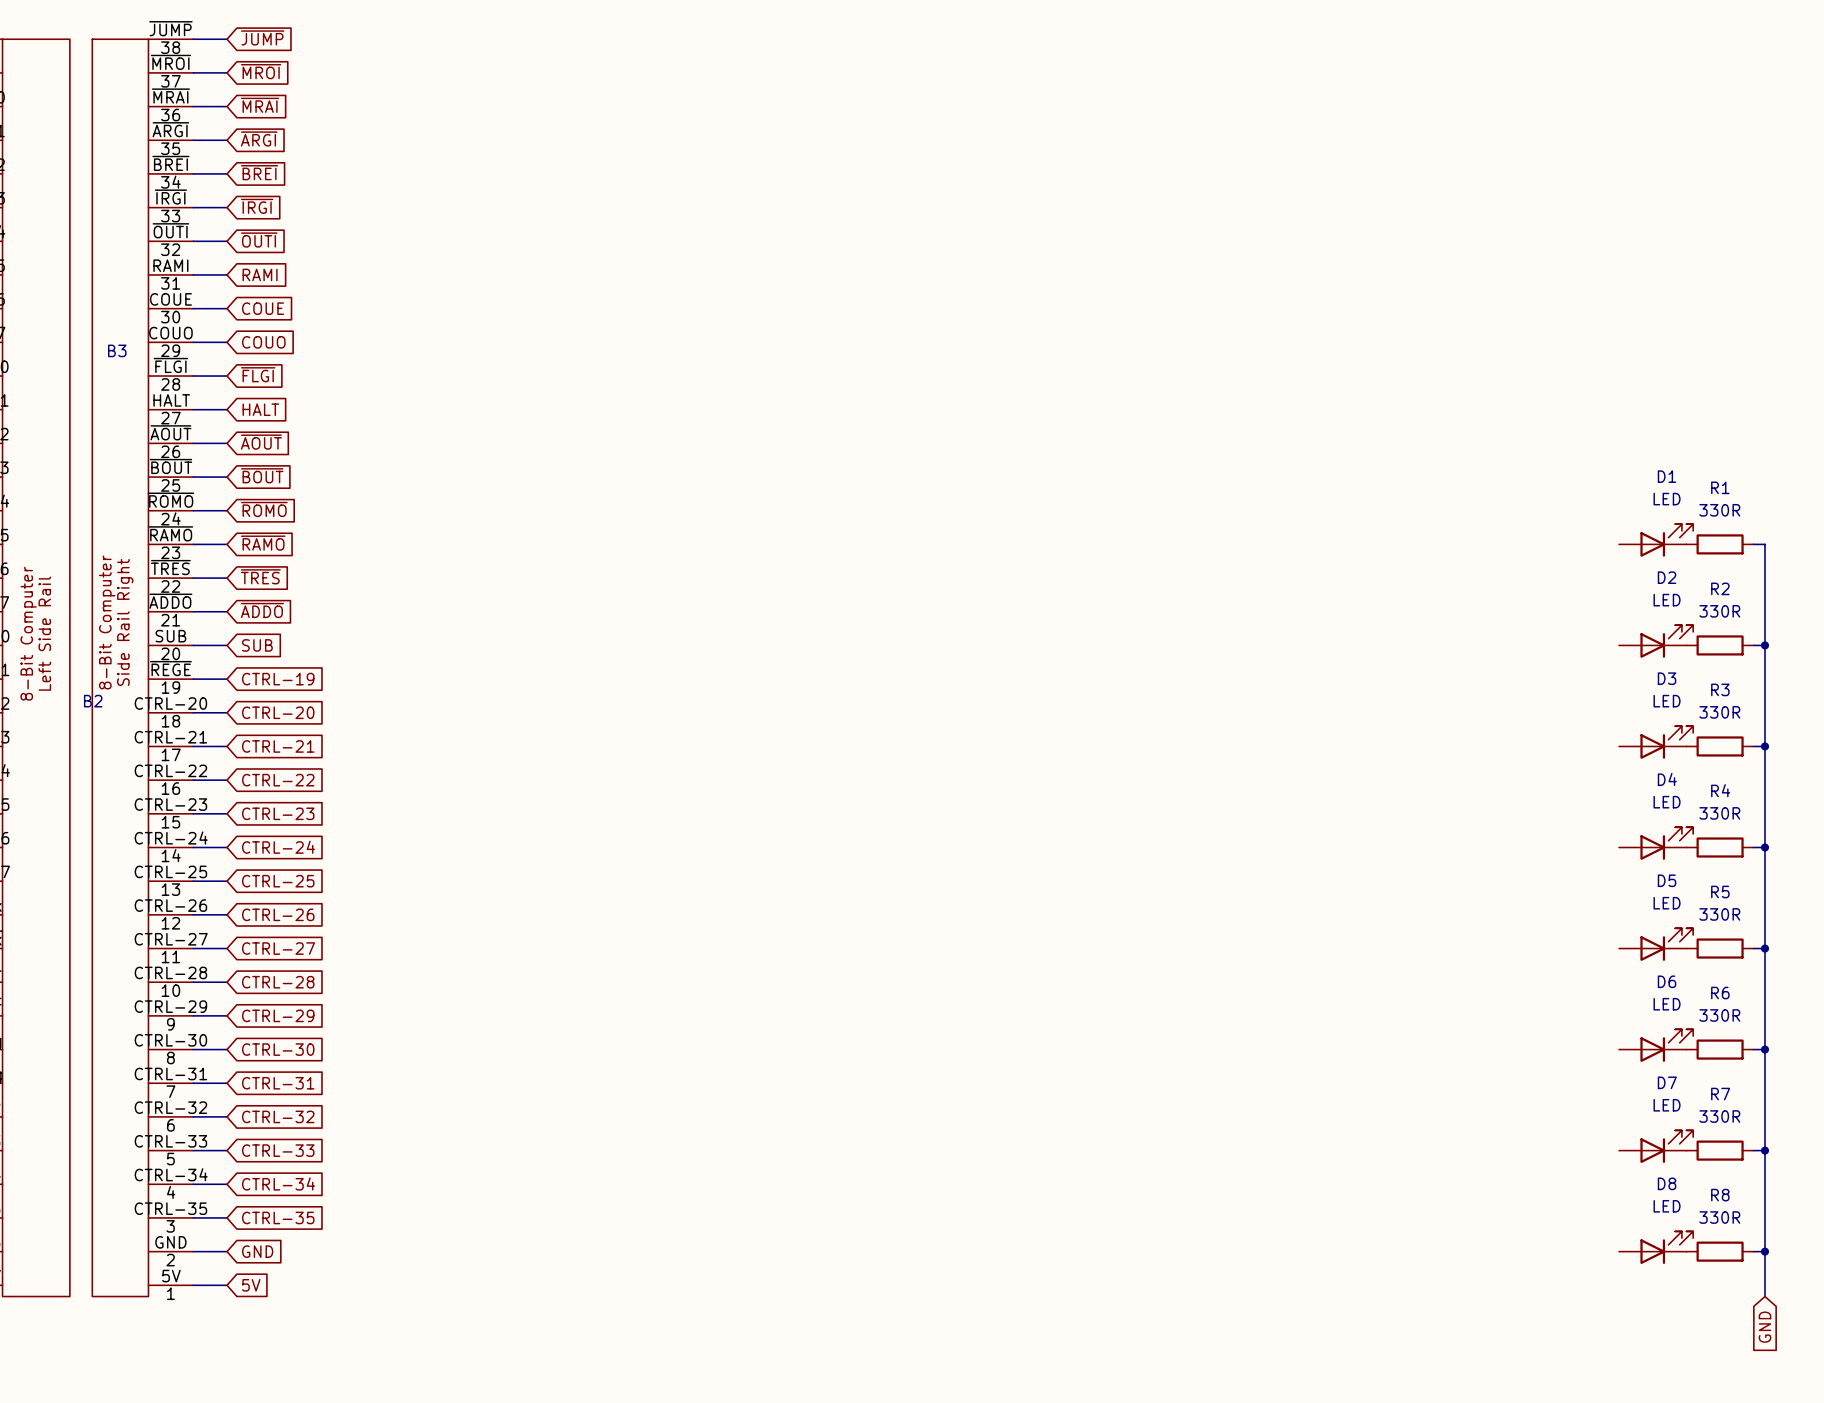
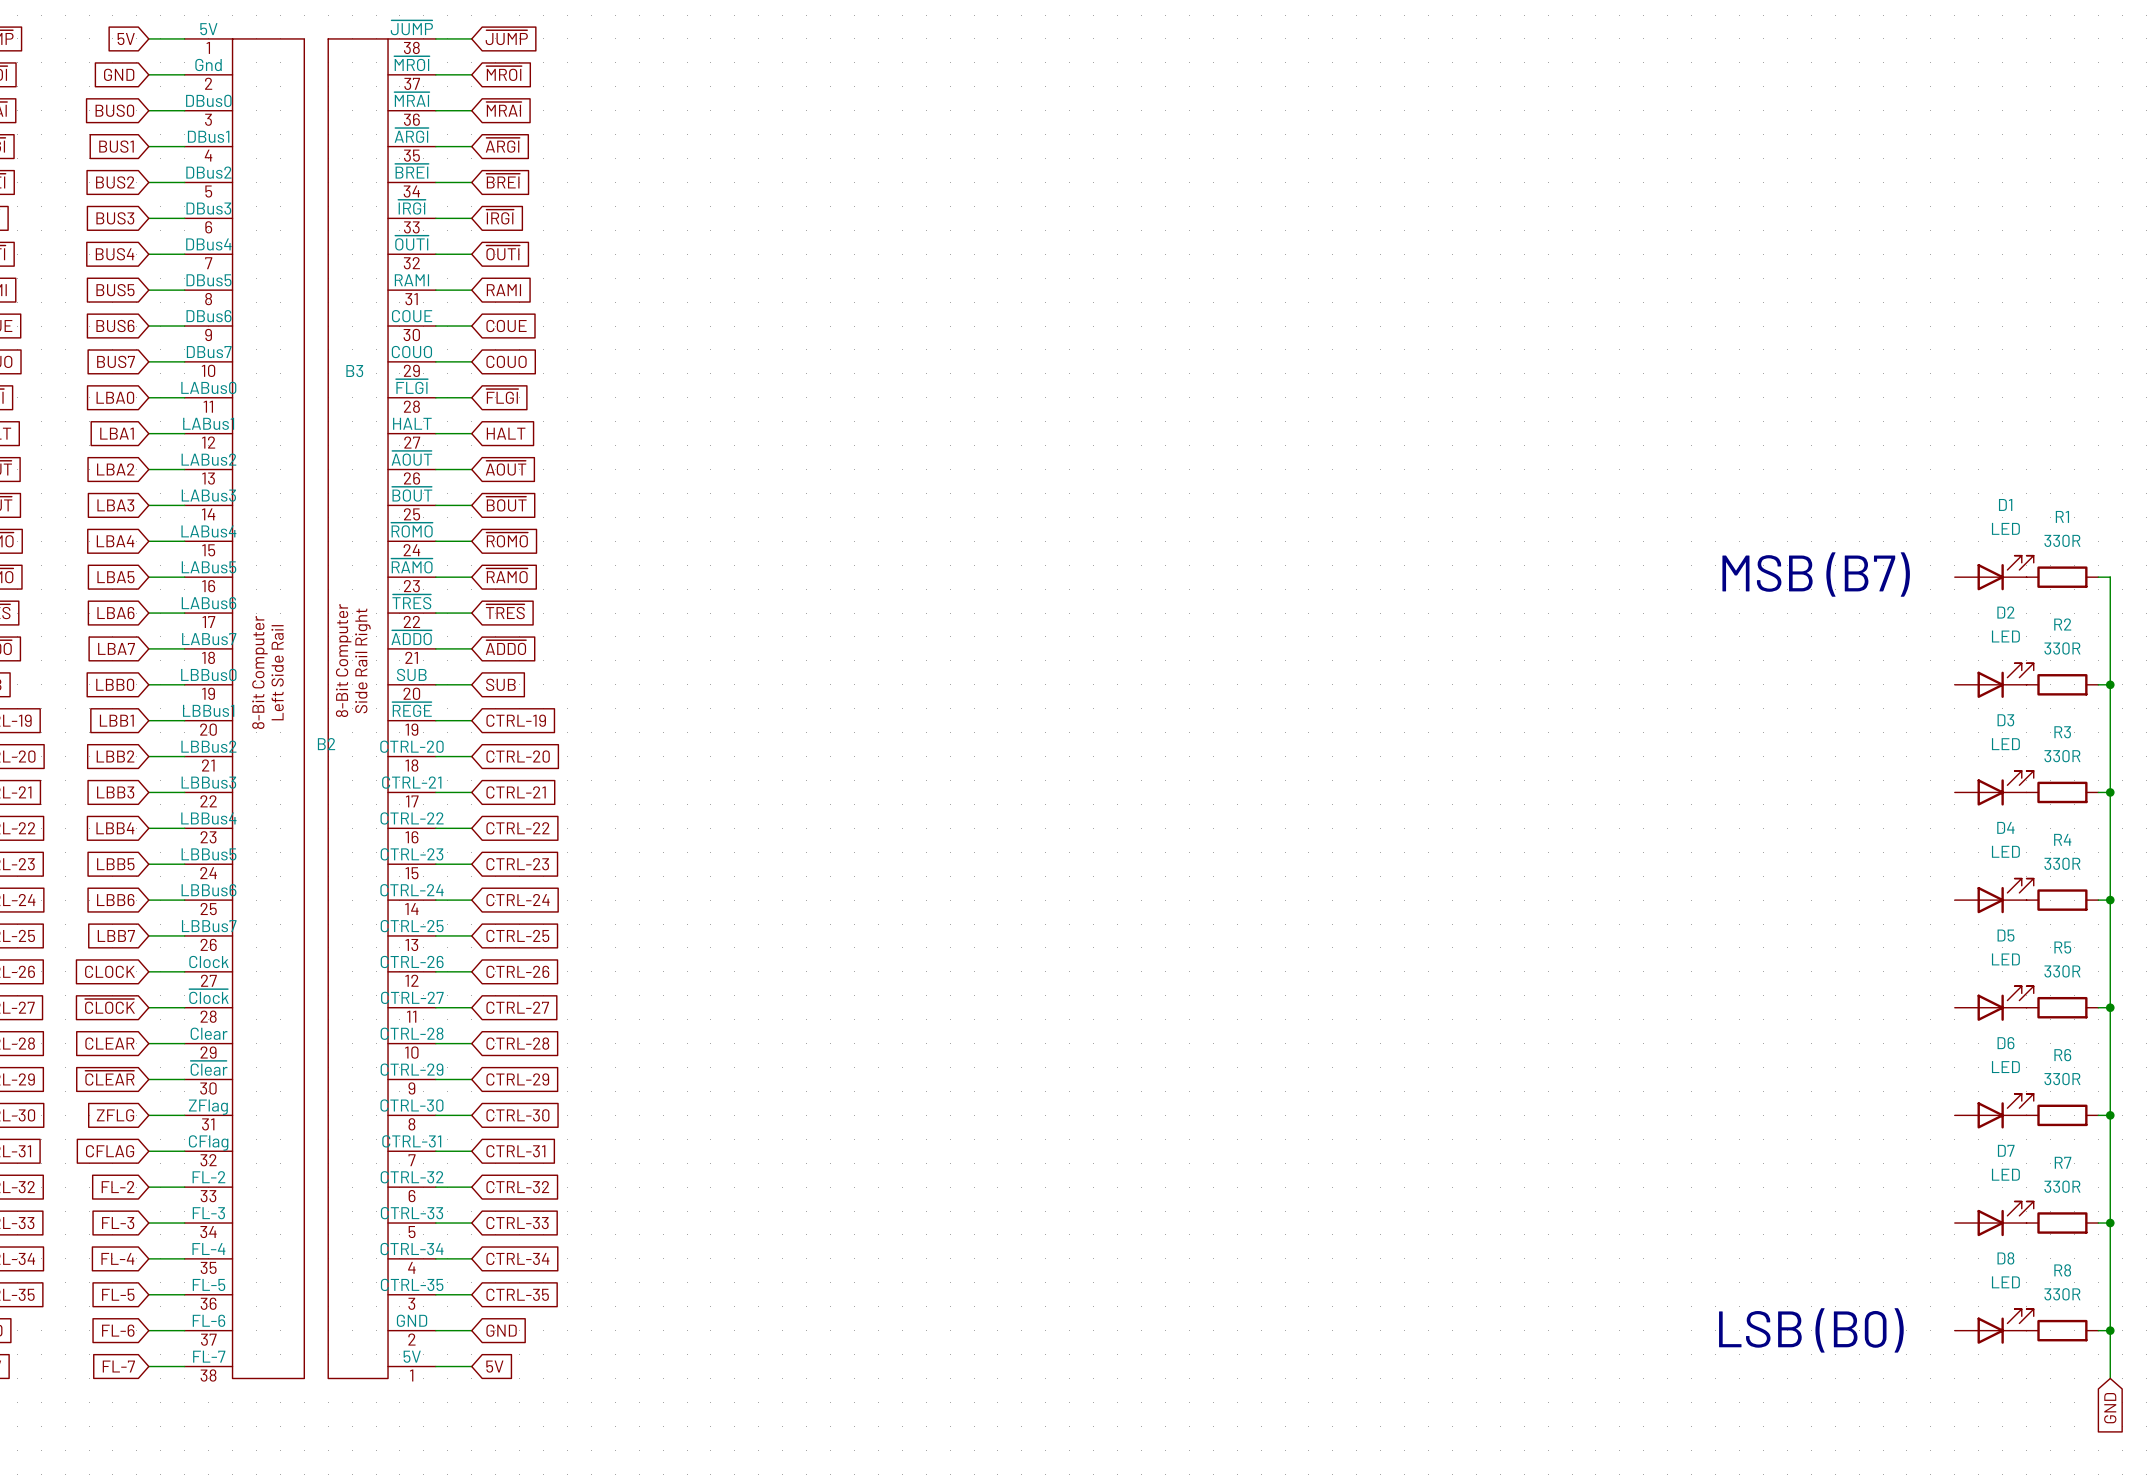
text: none -> MSB (B7) (1816, 574)
text: none -> LSB (B0) (1811, 1330)

